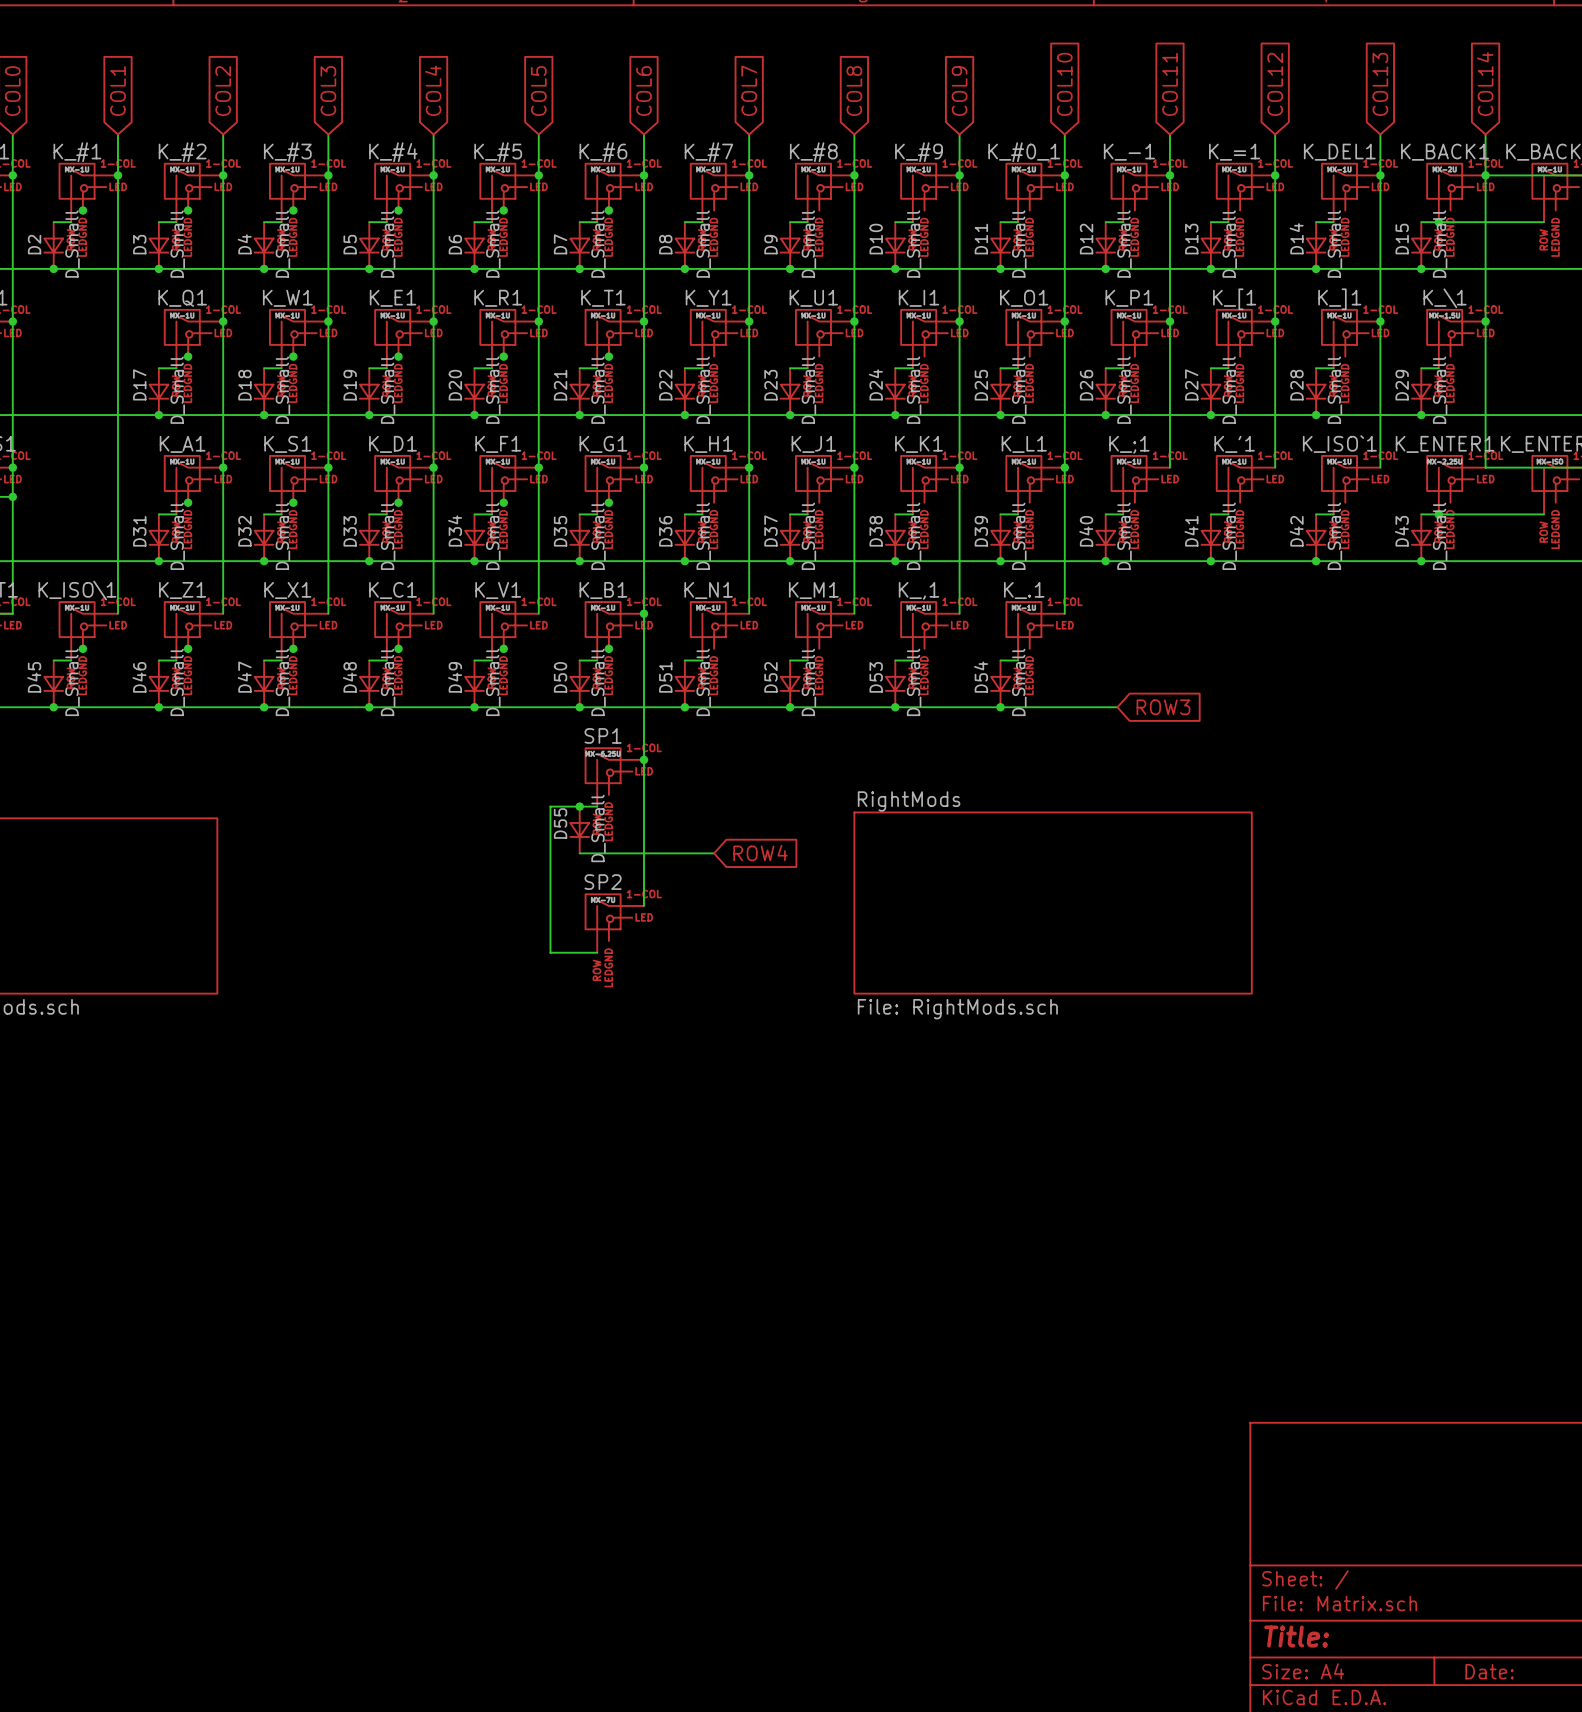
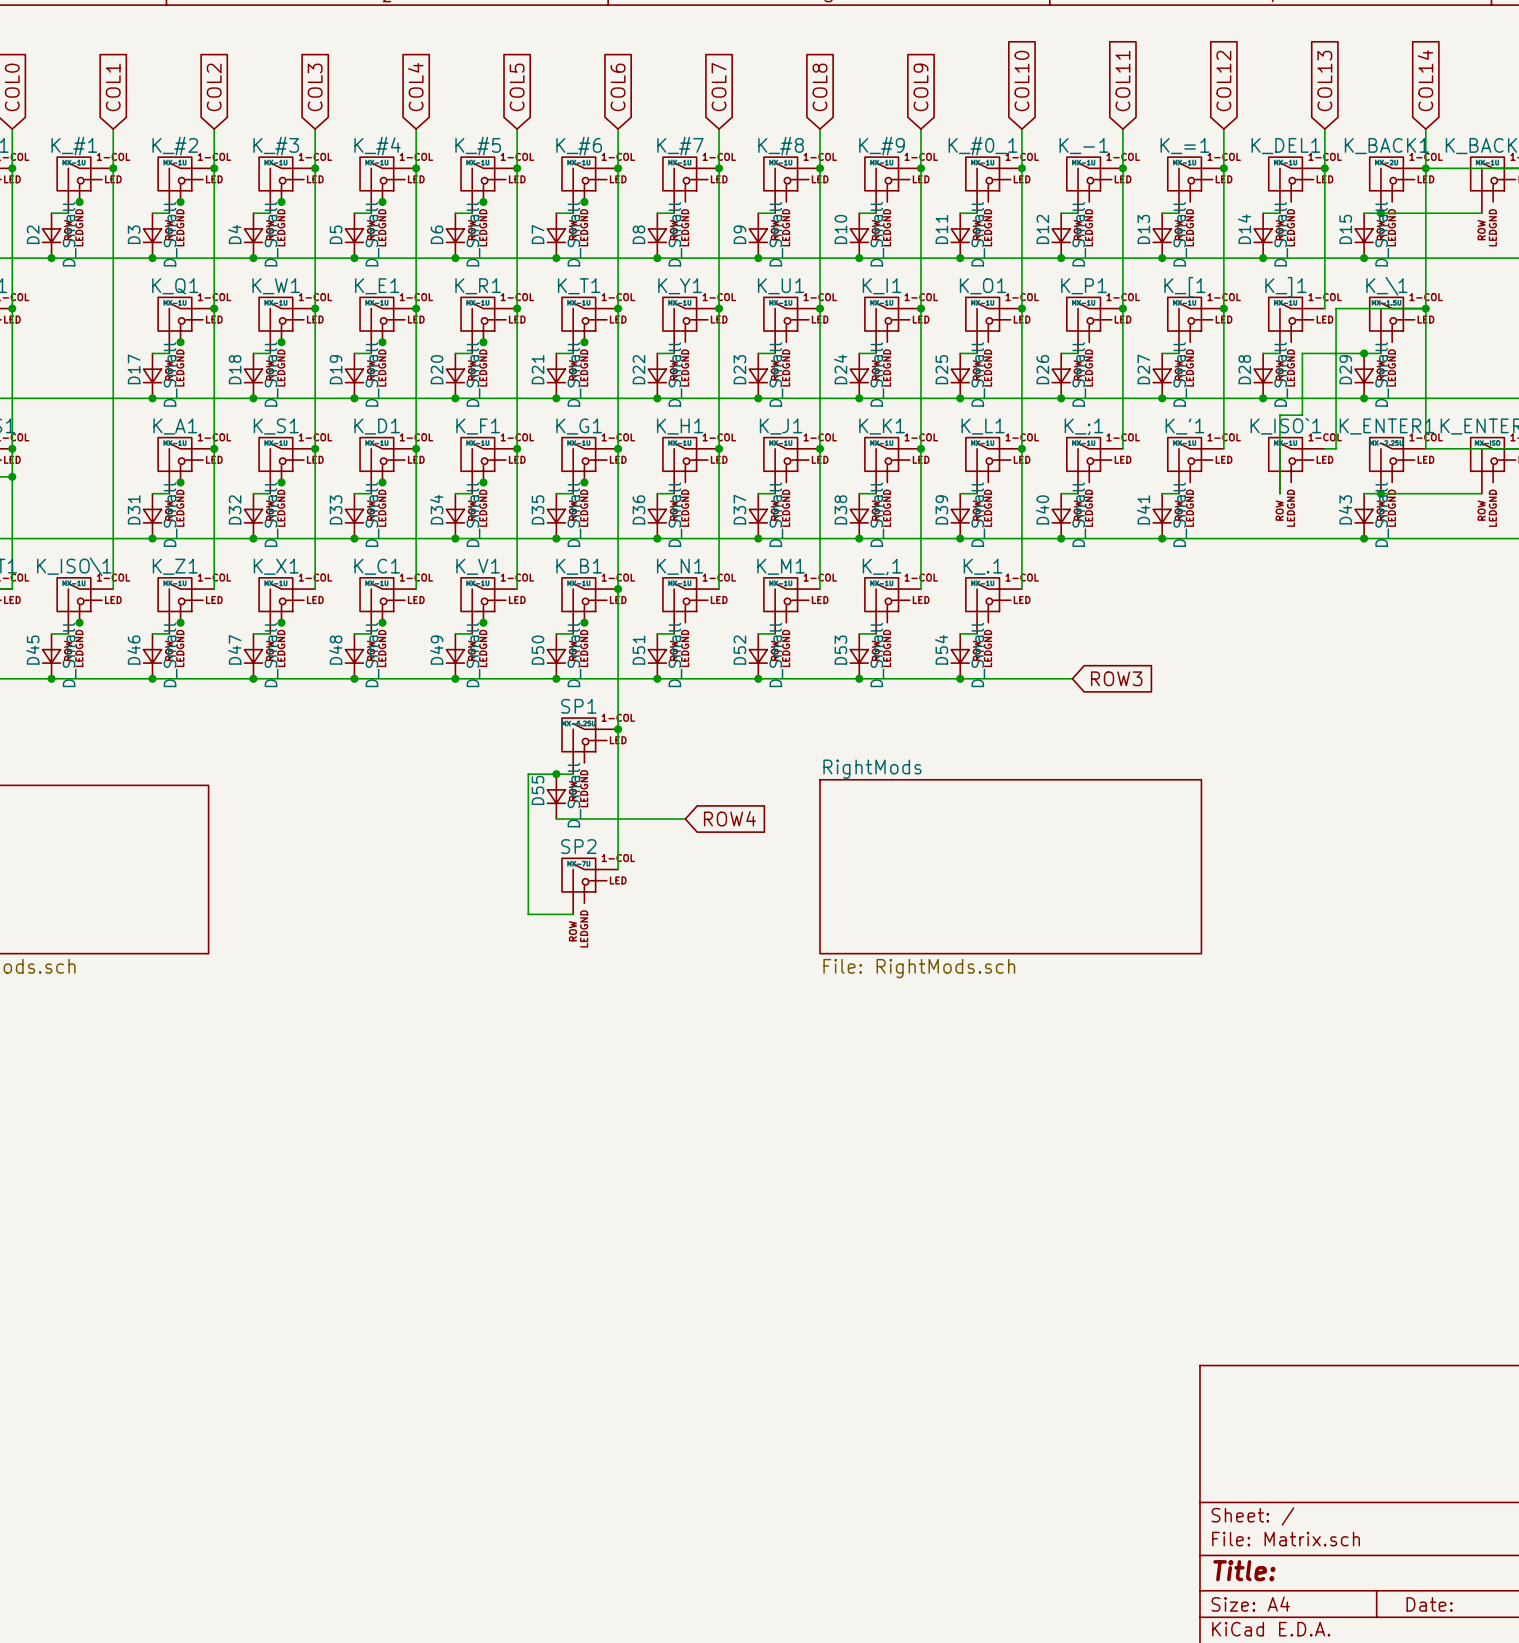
wire: (1380, 321) (1380, 467) -> (1425, 308) (1336, 308) (1336, 448) (1324, 448)
junction: (1380, 321) -> none
junction: none -> (1364, 353)
wire: (1316, 514) (1333, 514) -> (1364, 353) (1302, 353) (1302, 415) (1279, 415) (1279, 493)
D42: D_Small (1316, 537) -> none
junction: (1316, 561) -> none

